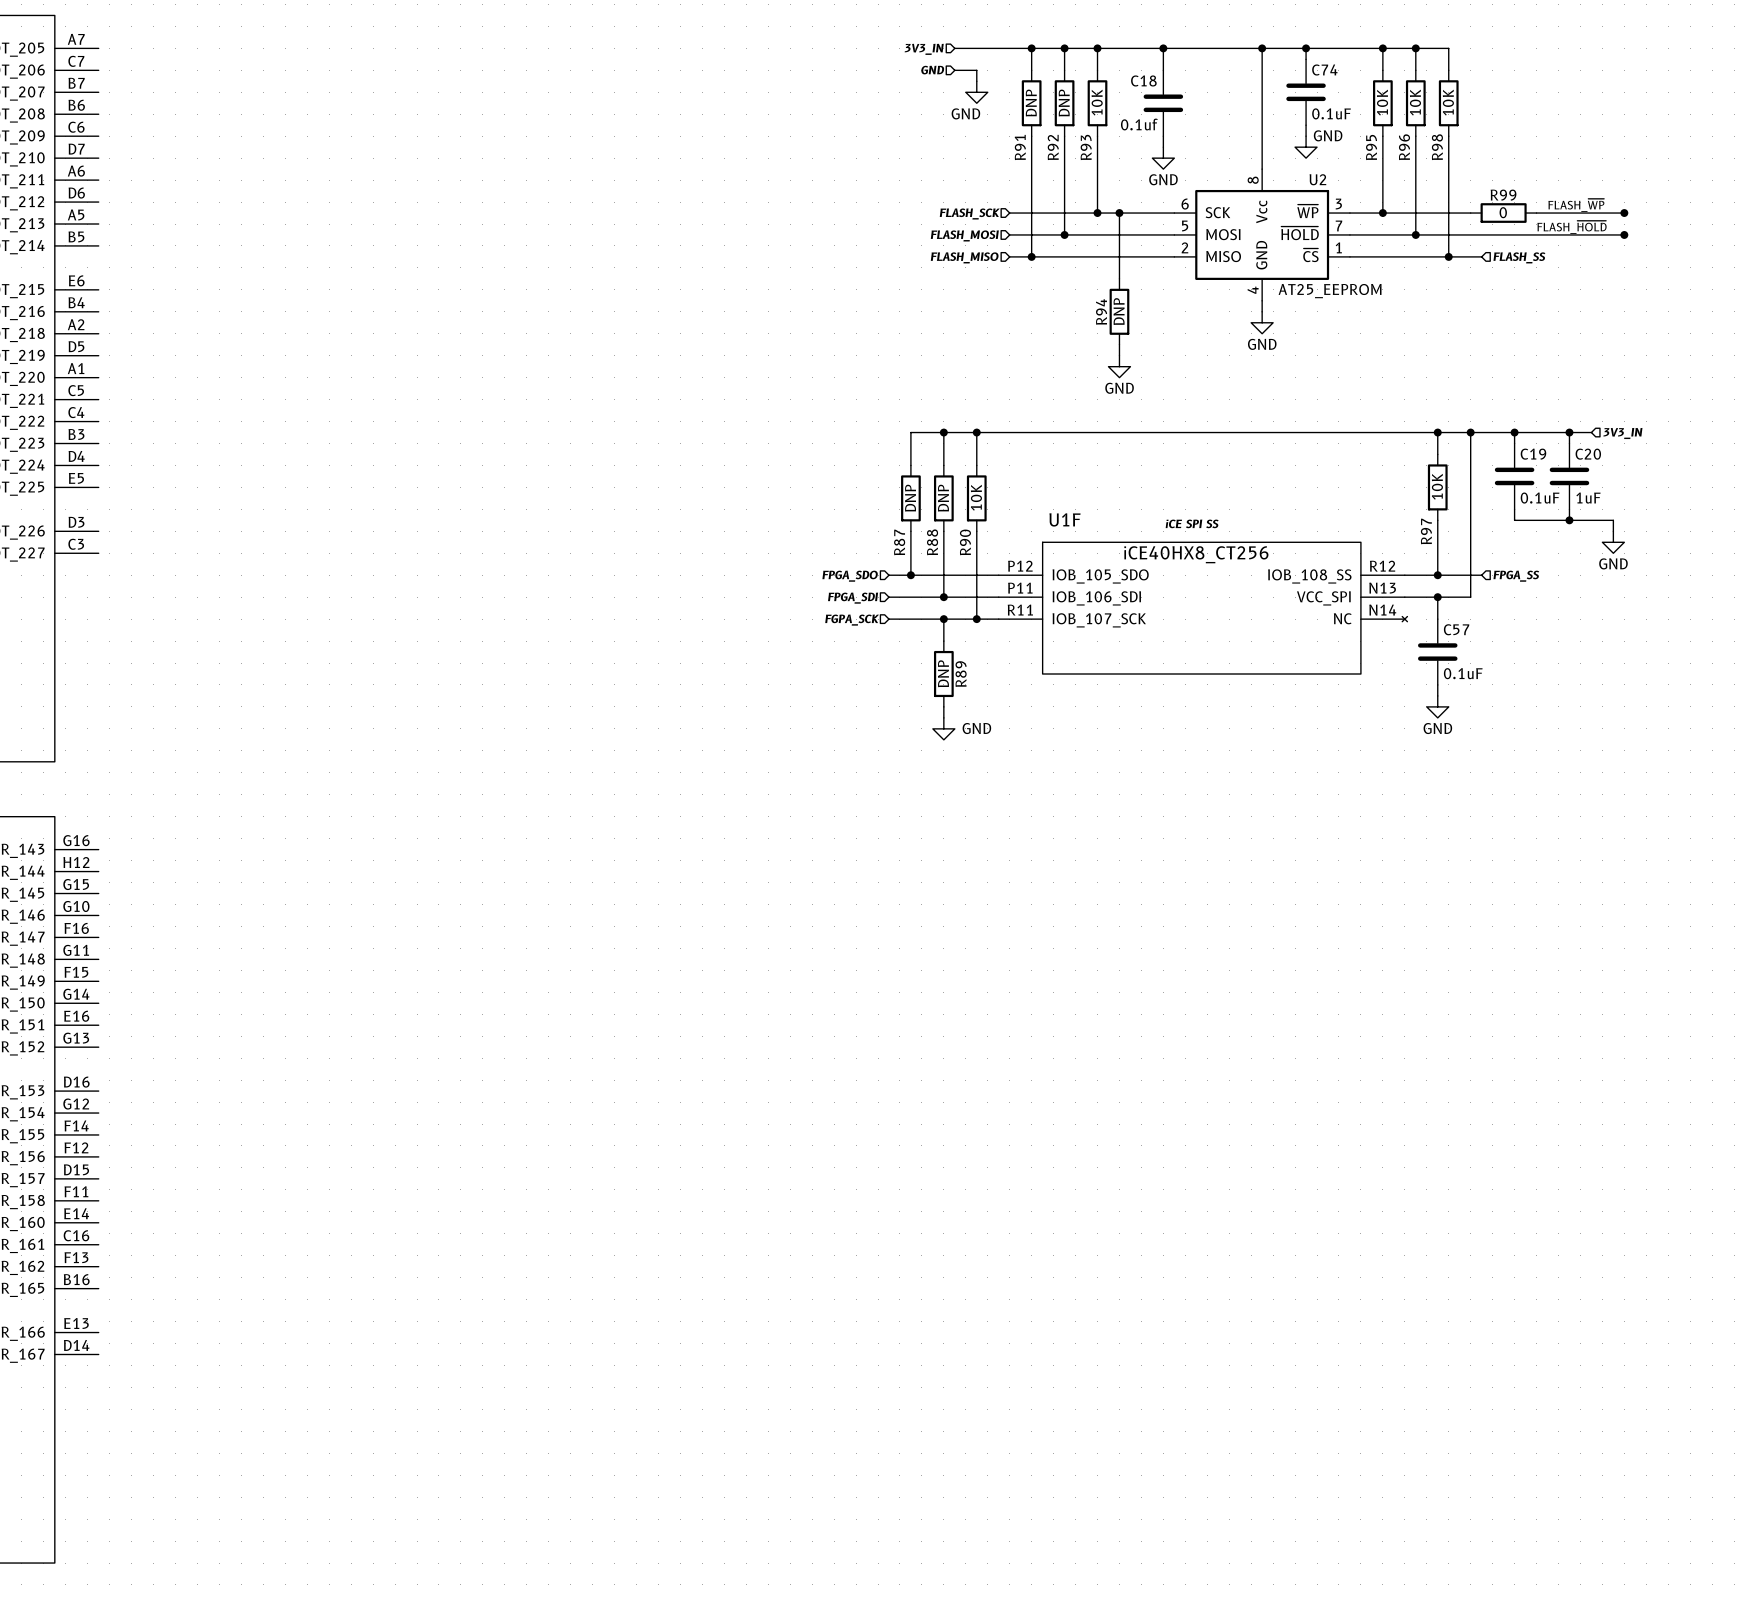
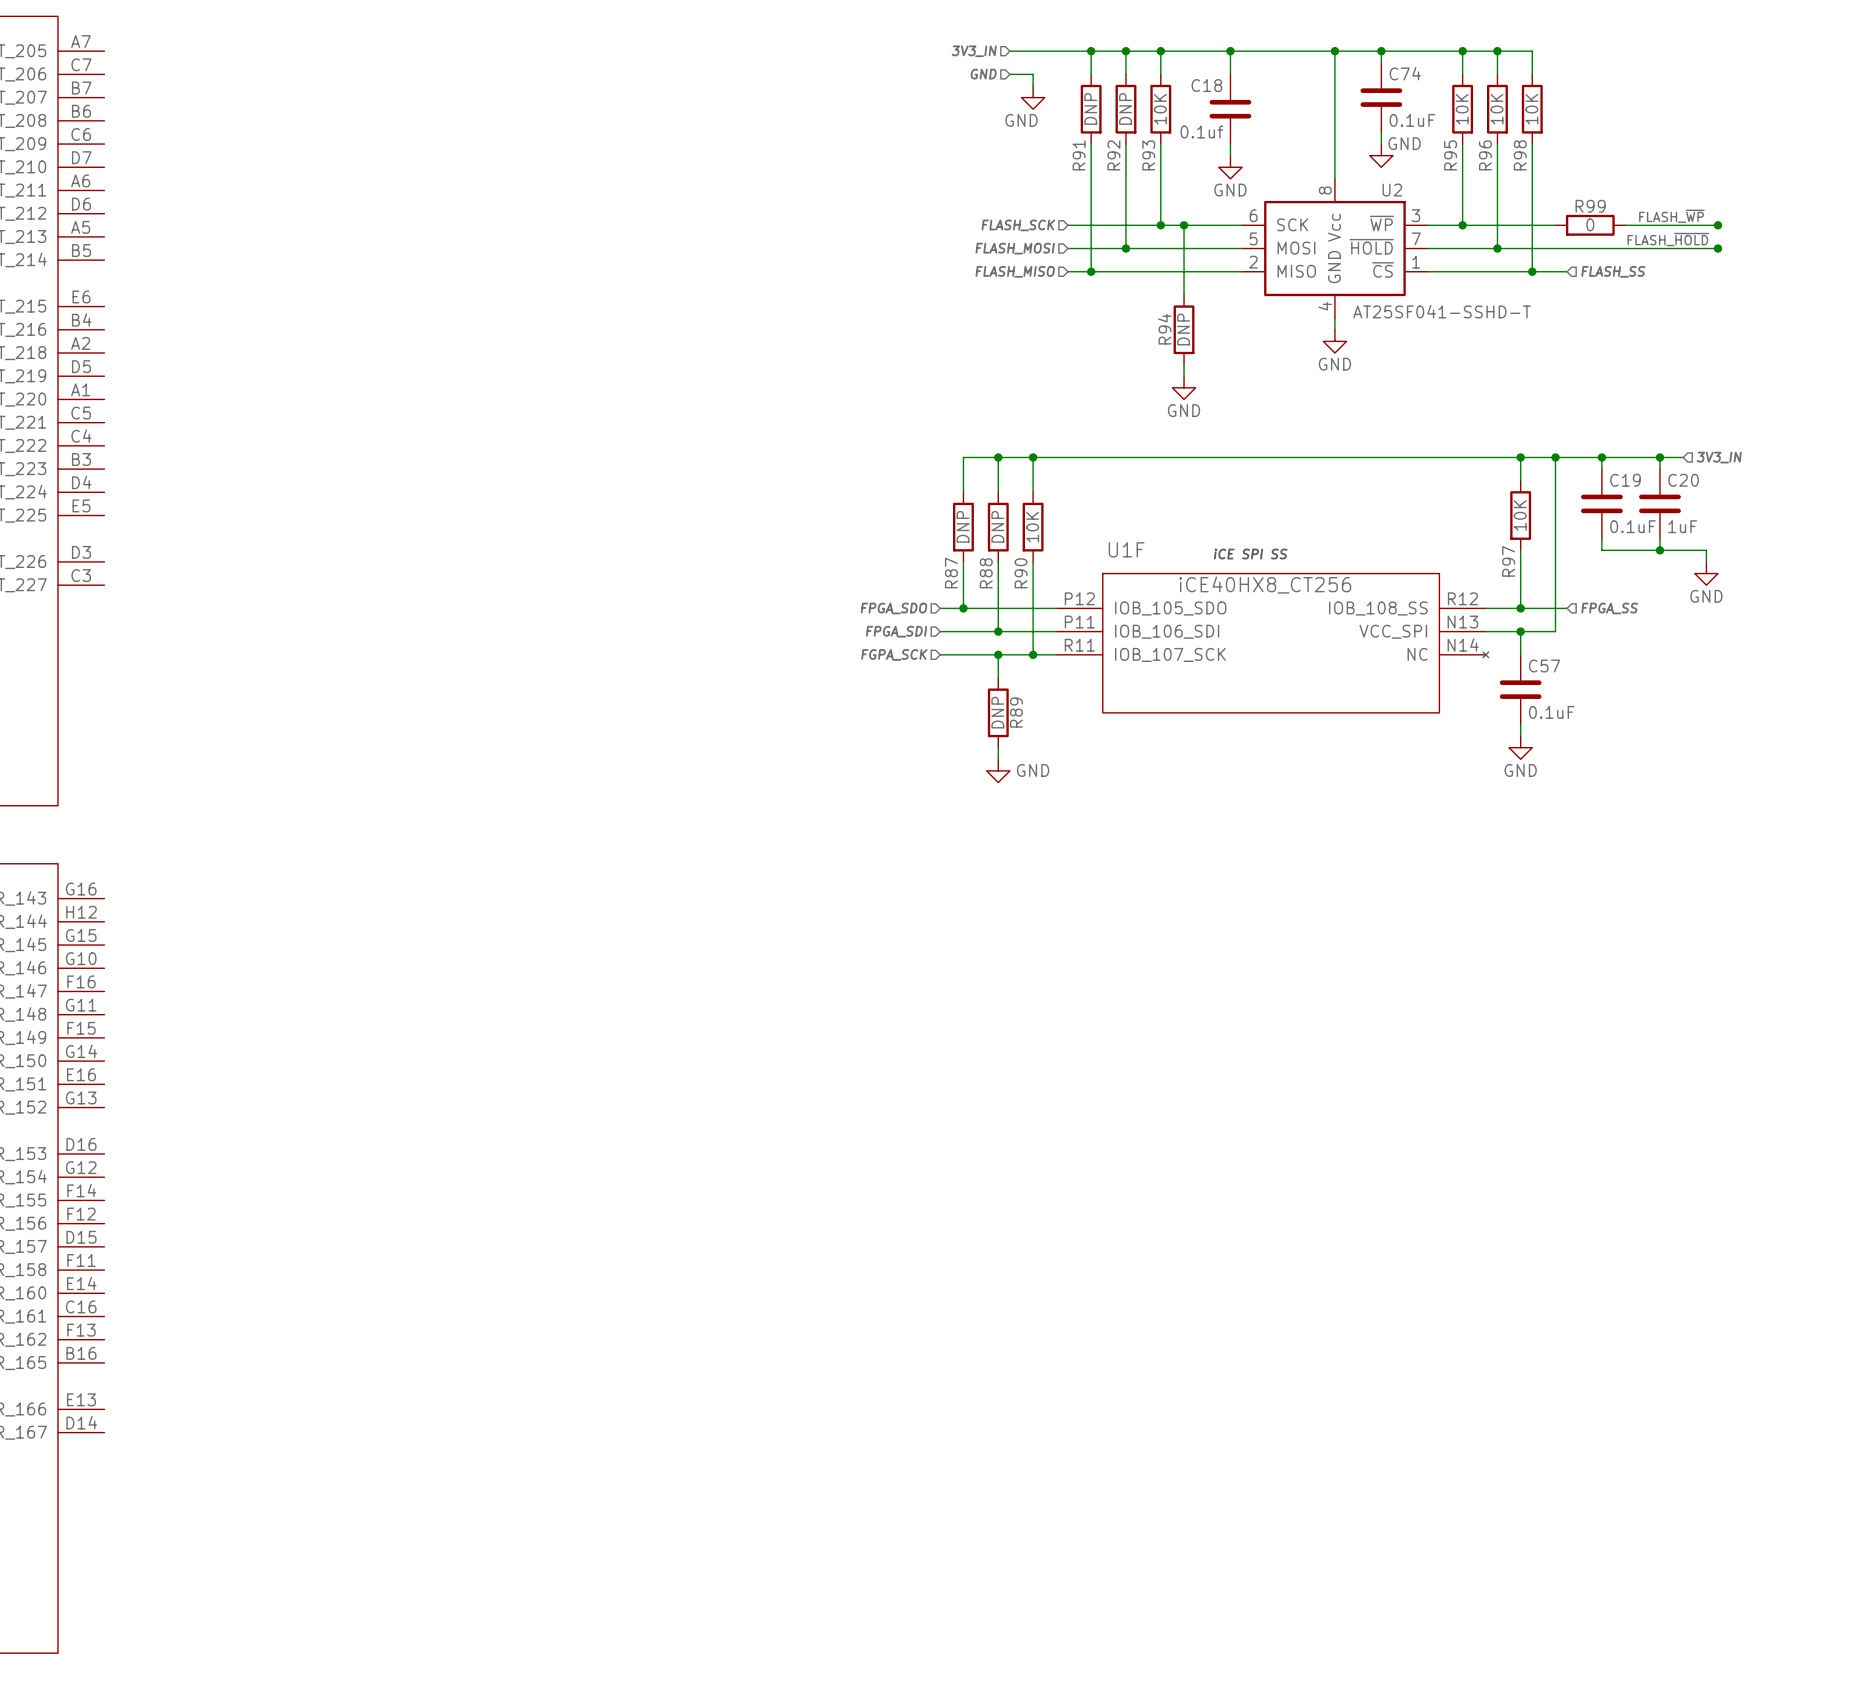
U2 value: AT25_EEPROM (1330, 291) -> AT25SF041-SSHD-T (1442, 311)

